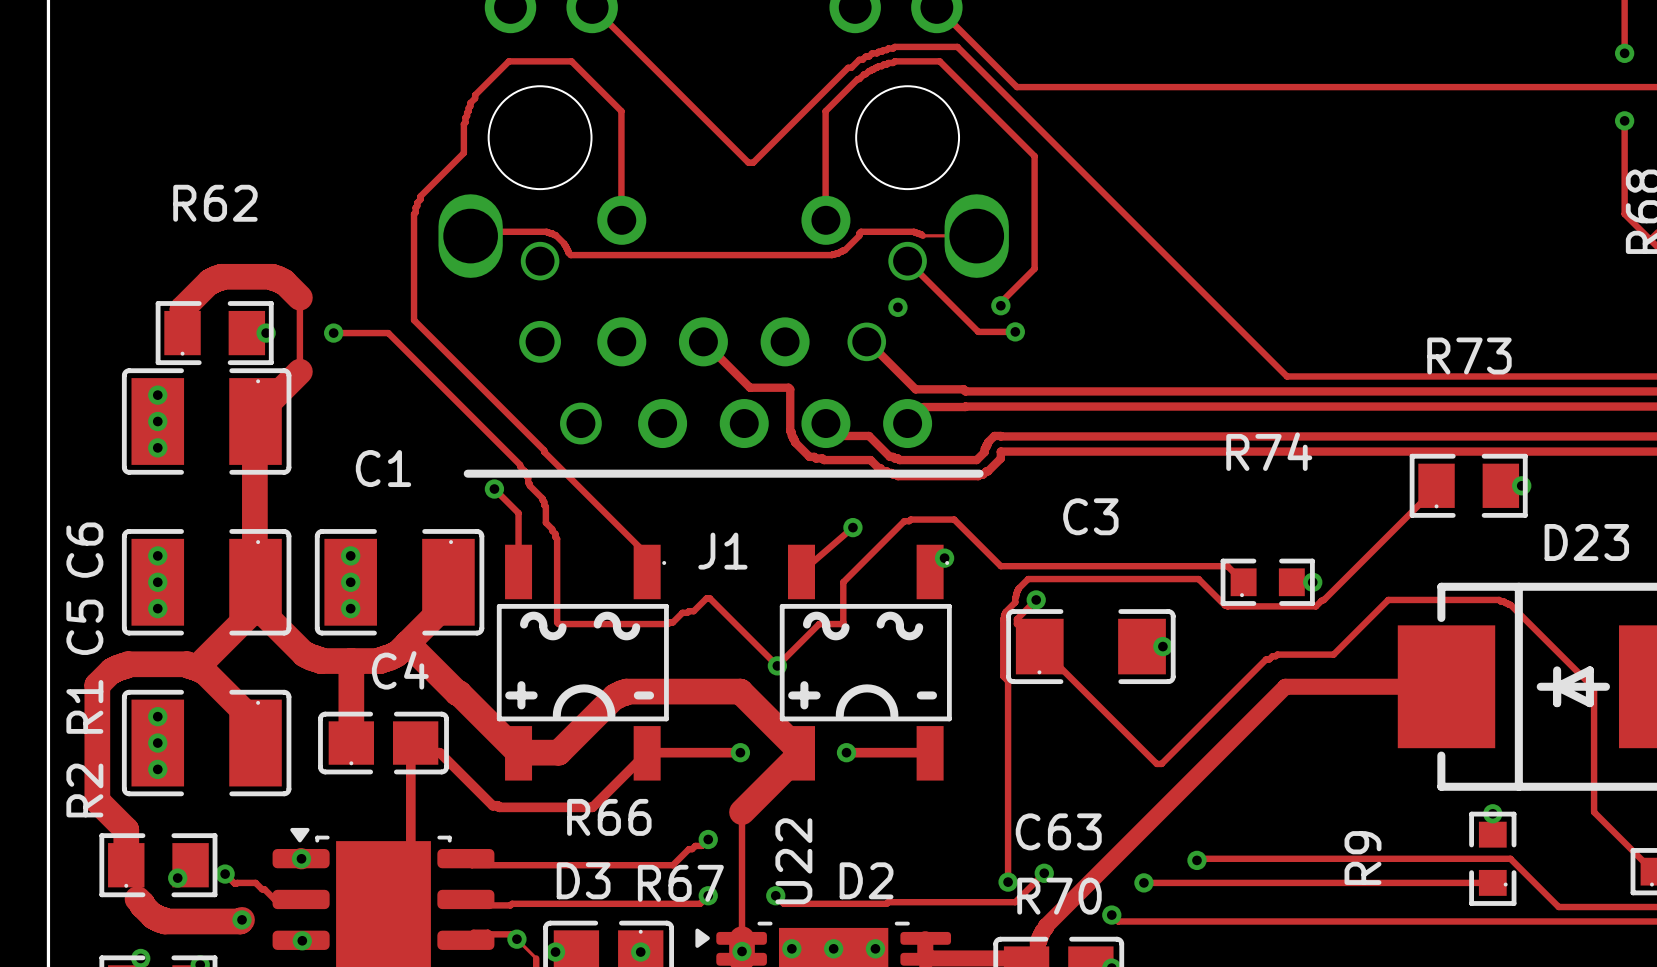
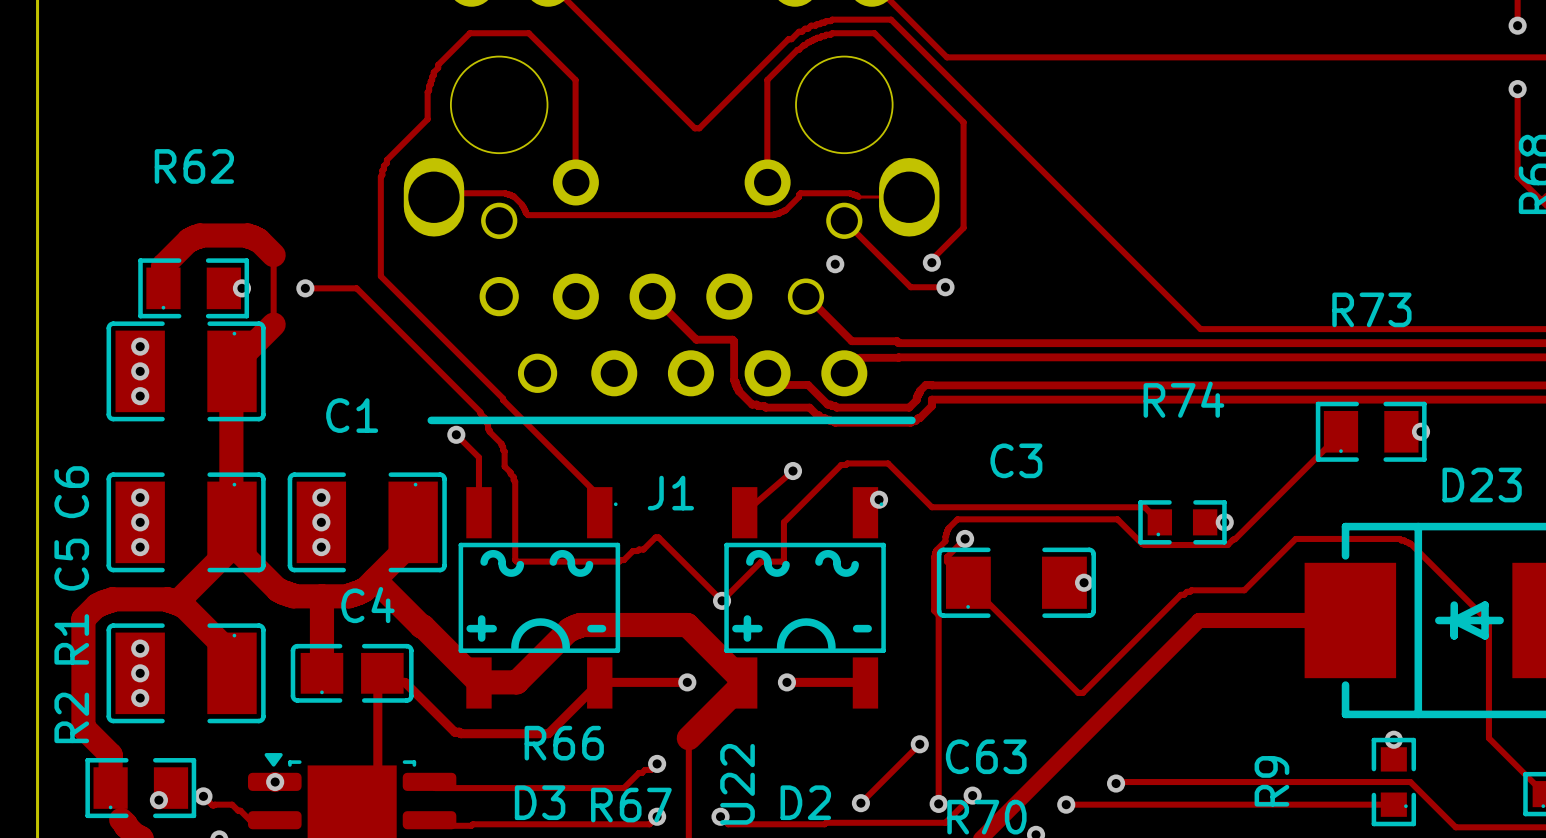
track: none -> (919, 744) (860, 803)
via: none -> (919, 744)
via: none -> (860, 803)

